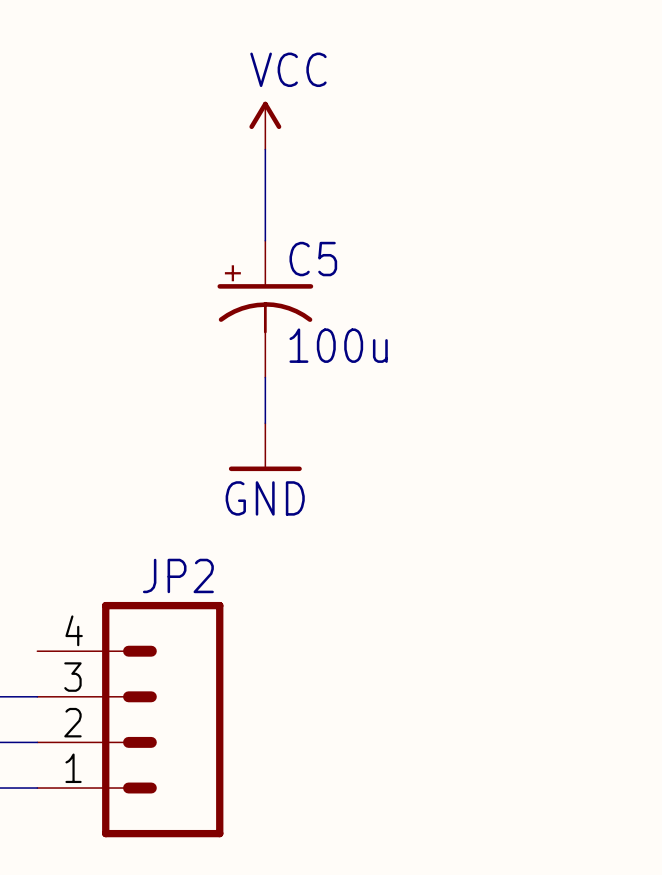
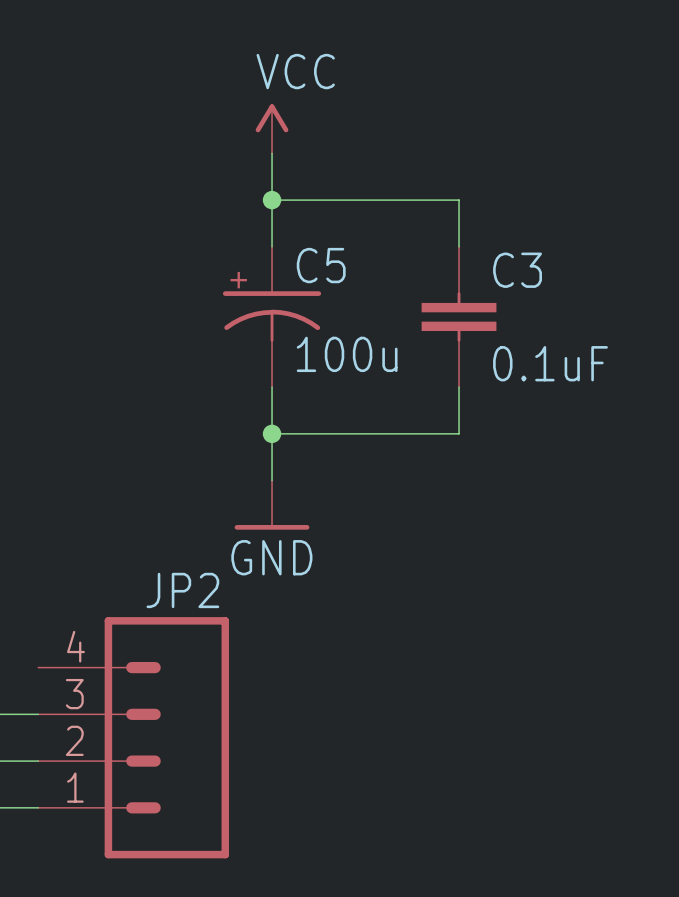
wire: none -> (272, 200) (459, 200) (459, 246)
junction: none -> (272, 200)
C3: none -> 0.1uF (459, 316)
wire: none -> (459, 387) (459, 433) (272, 433) (272, 480)
junction: none -> (272, 433)
power symbol position: GND (265, 447) -> GND (272, 505)

